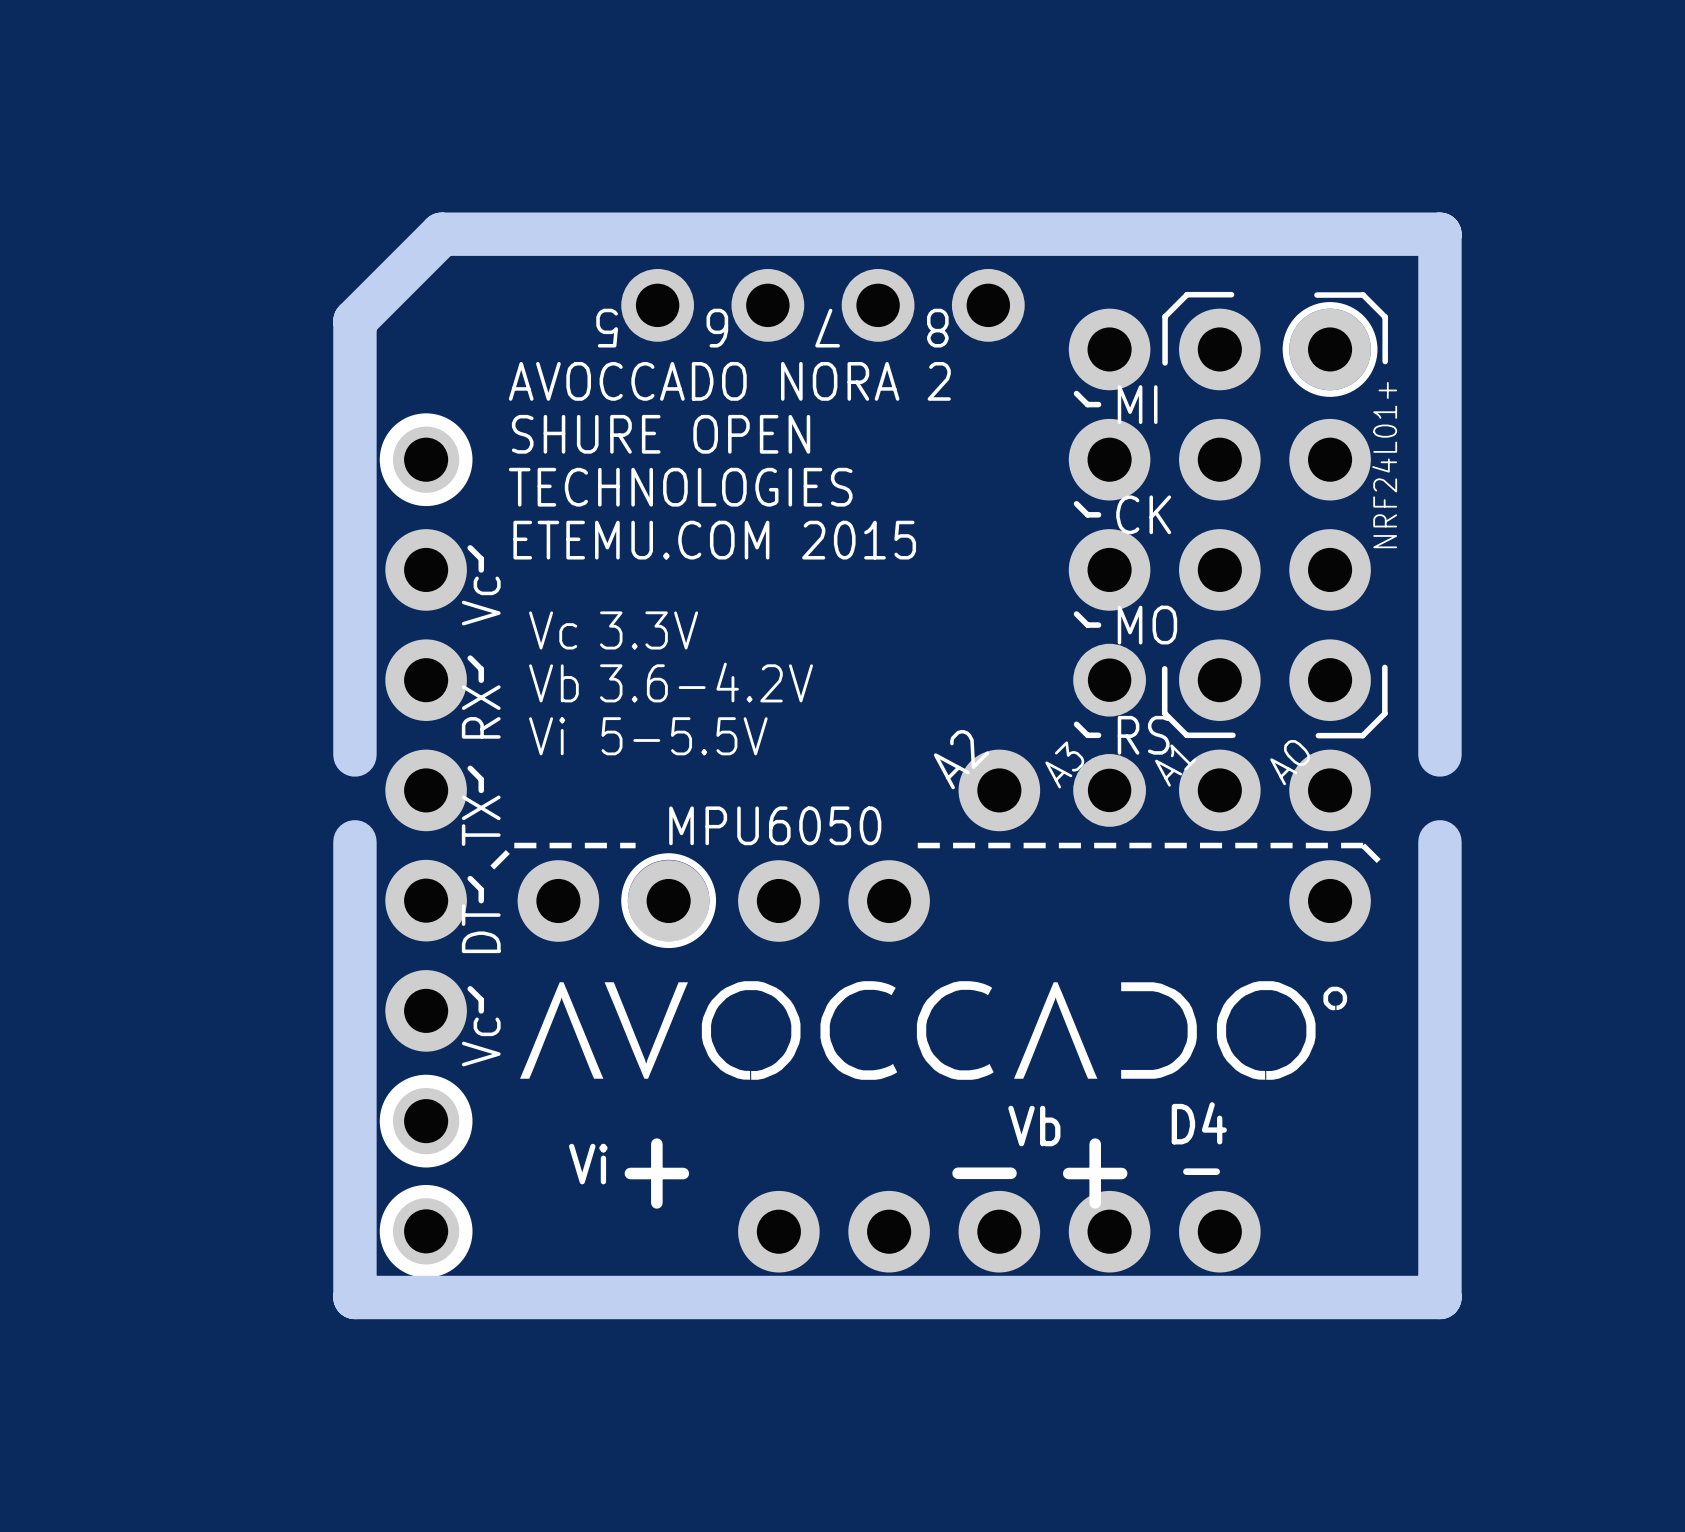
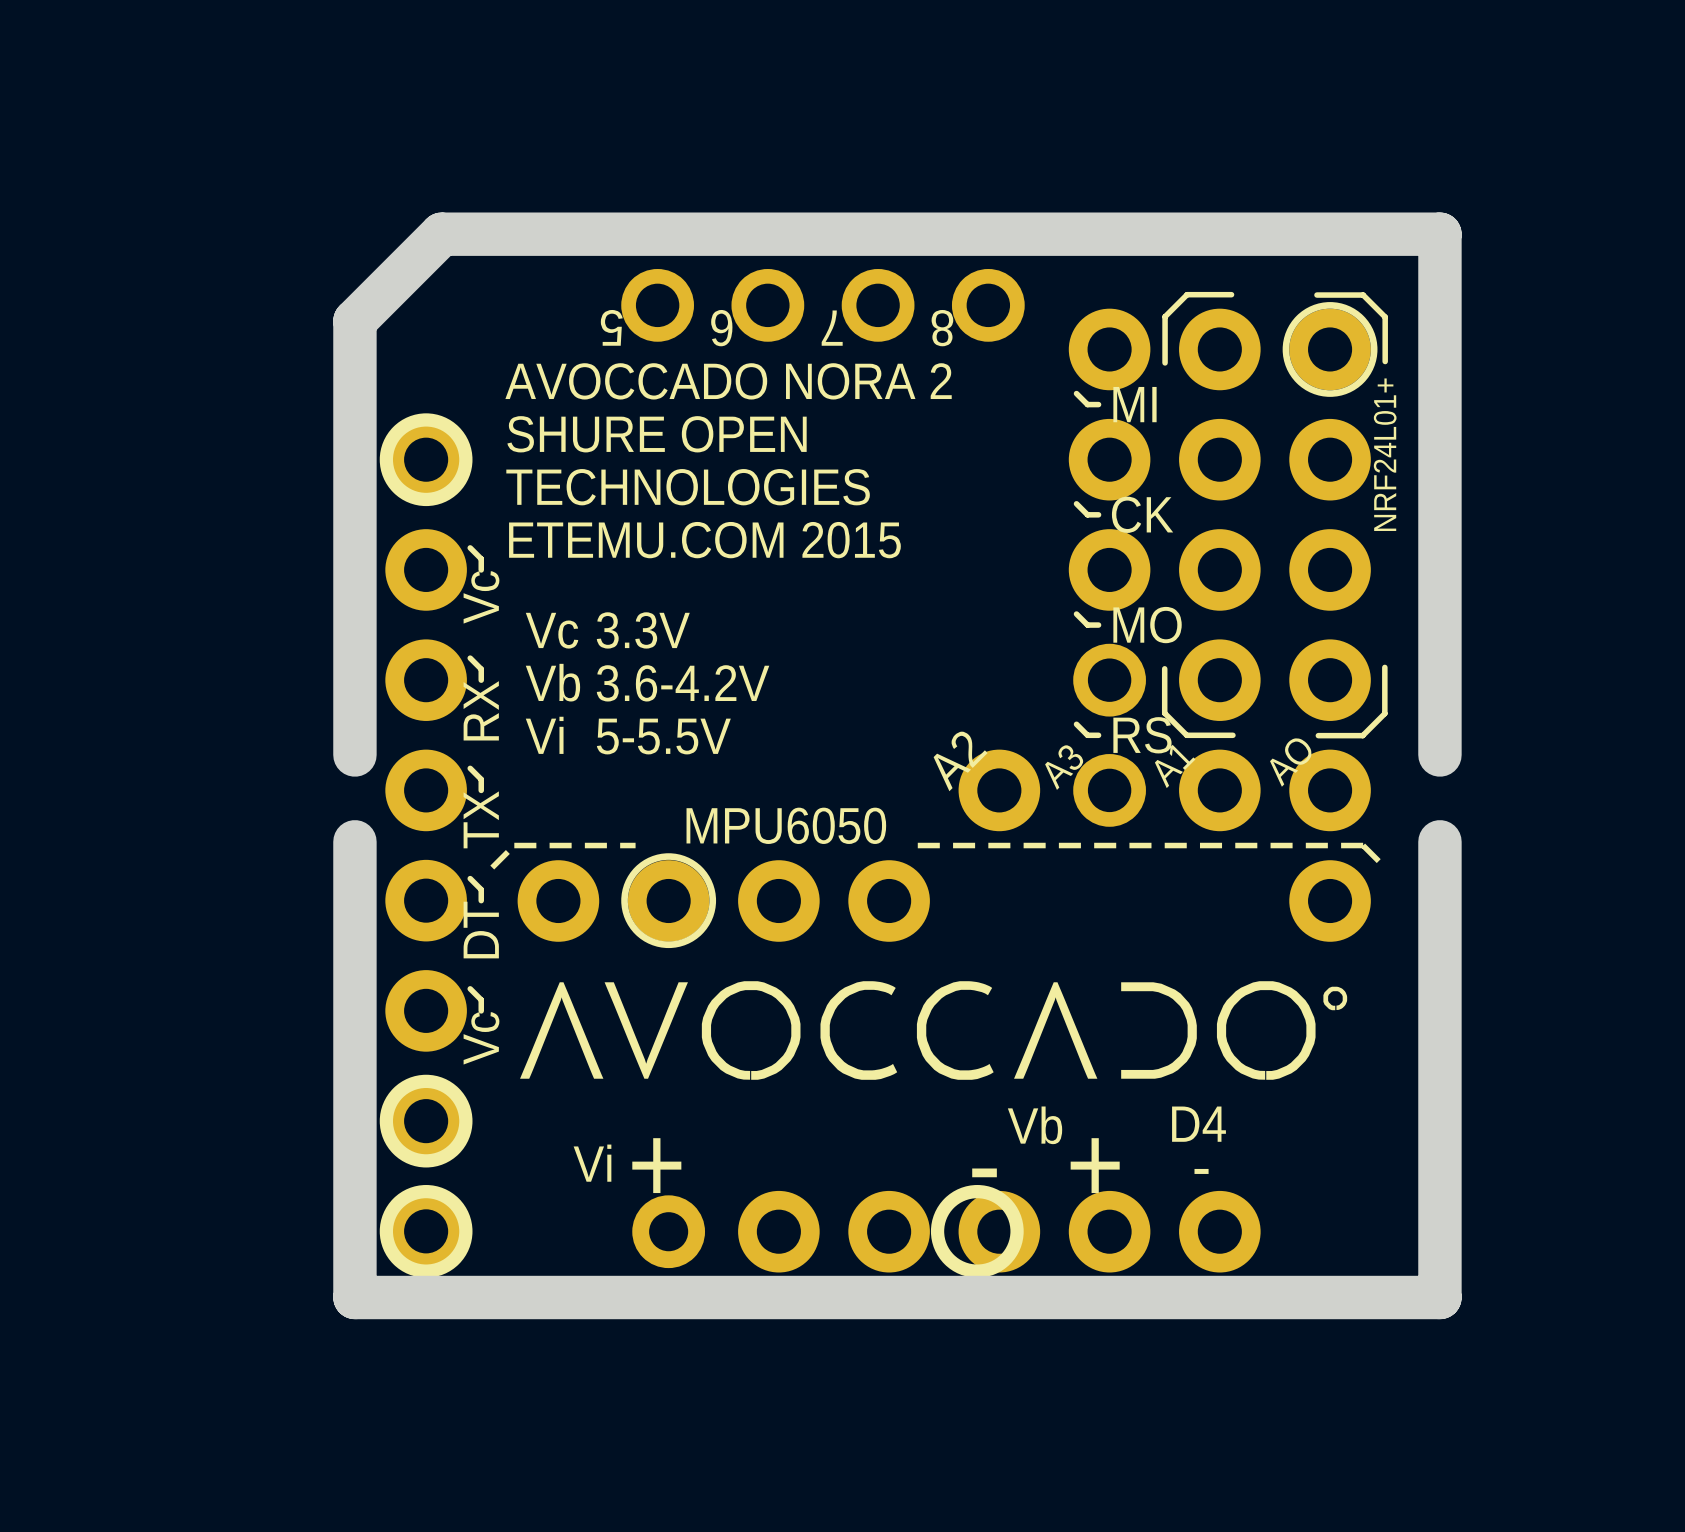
drawing: none -> [930, 1185, 1024, 1278]
part: none -> (668, 1231)

